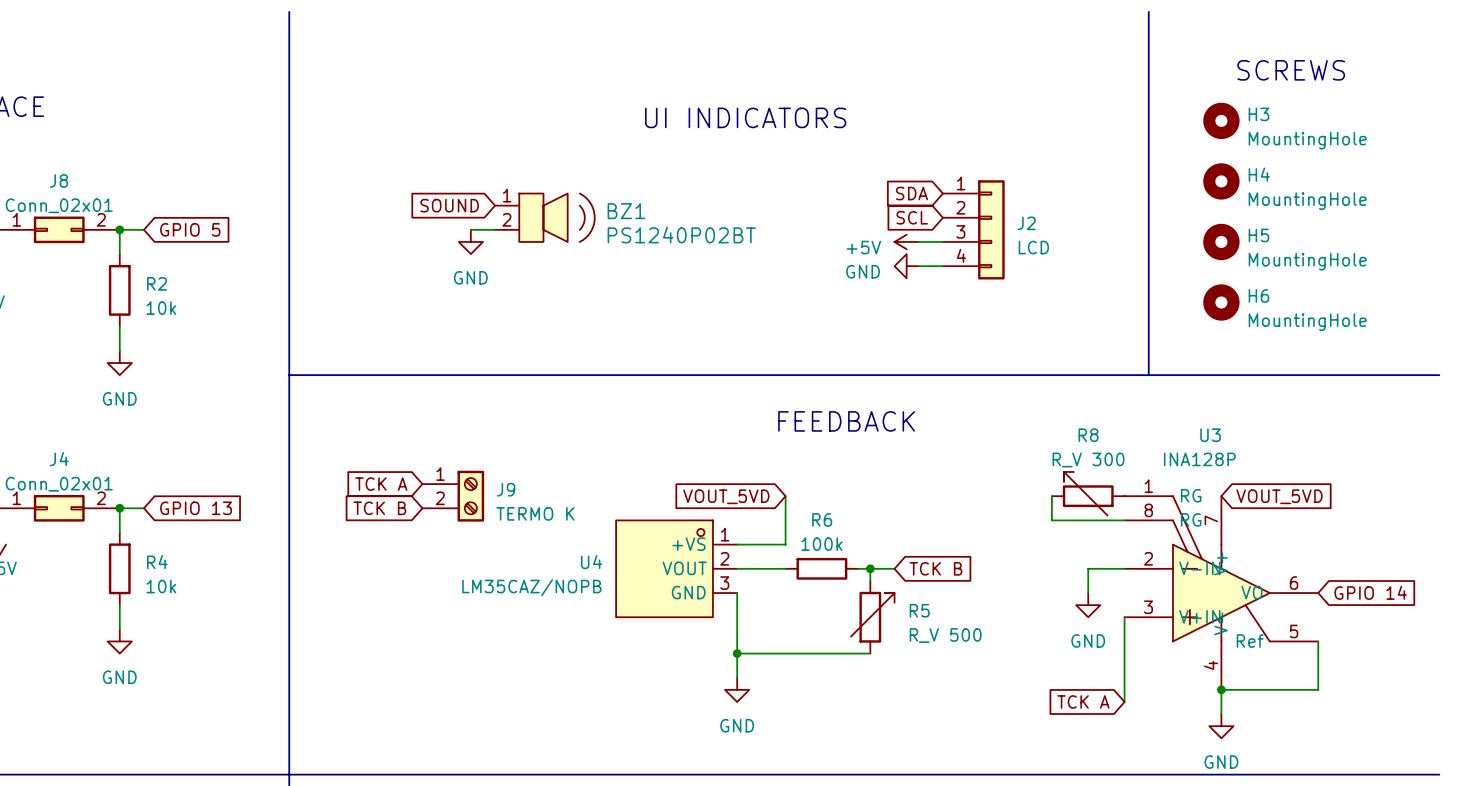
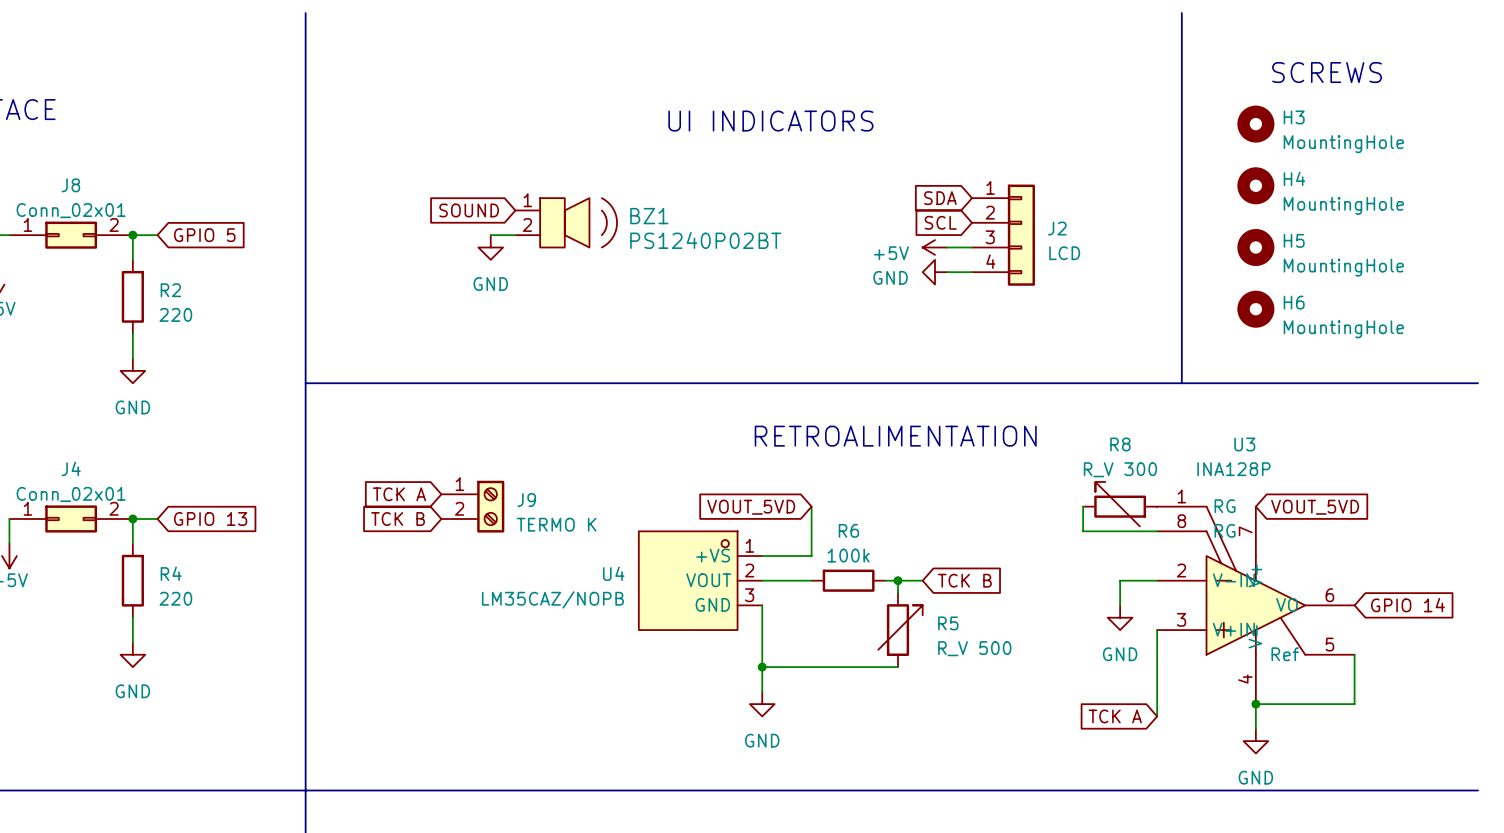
R2 value: 10k (161, 308) -> 220 (175, 314)
text: FEEDBACK (846, 421) -> none
text: none -> RETROALIMENTATION (895, 436)
R4 value: 10k (161, 586) -> 220 (175, 598)

